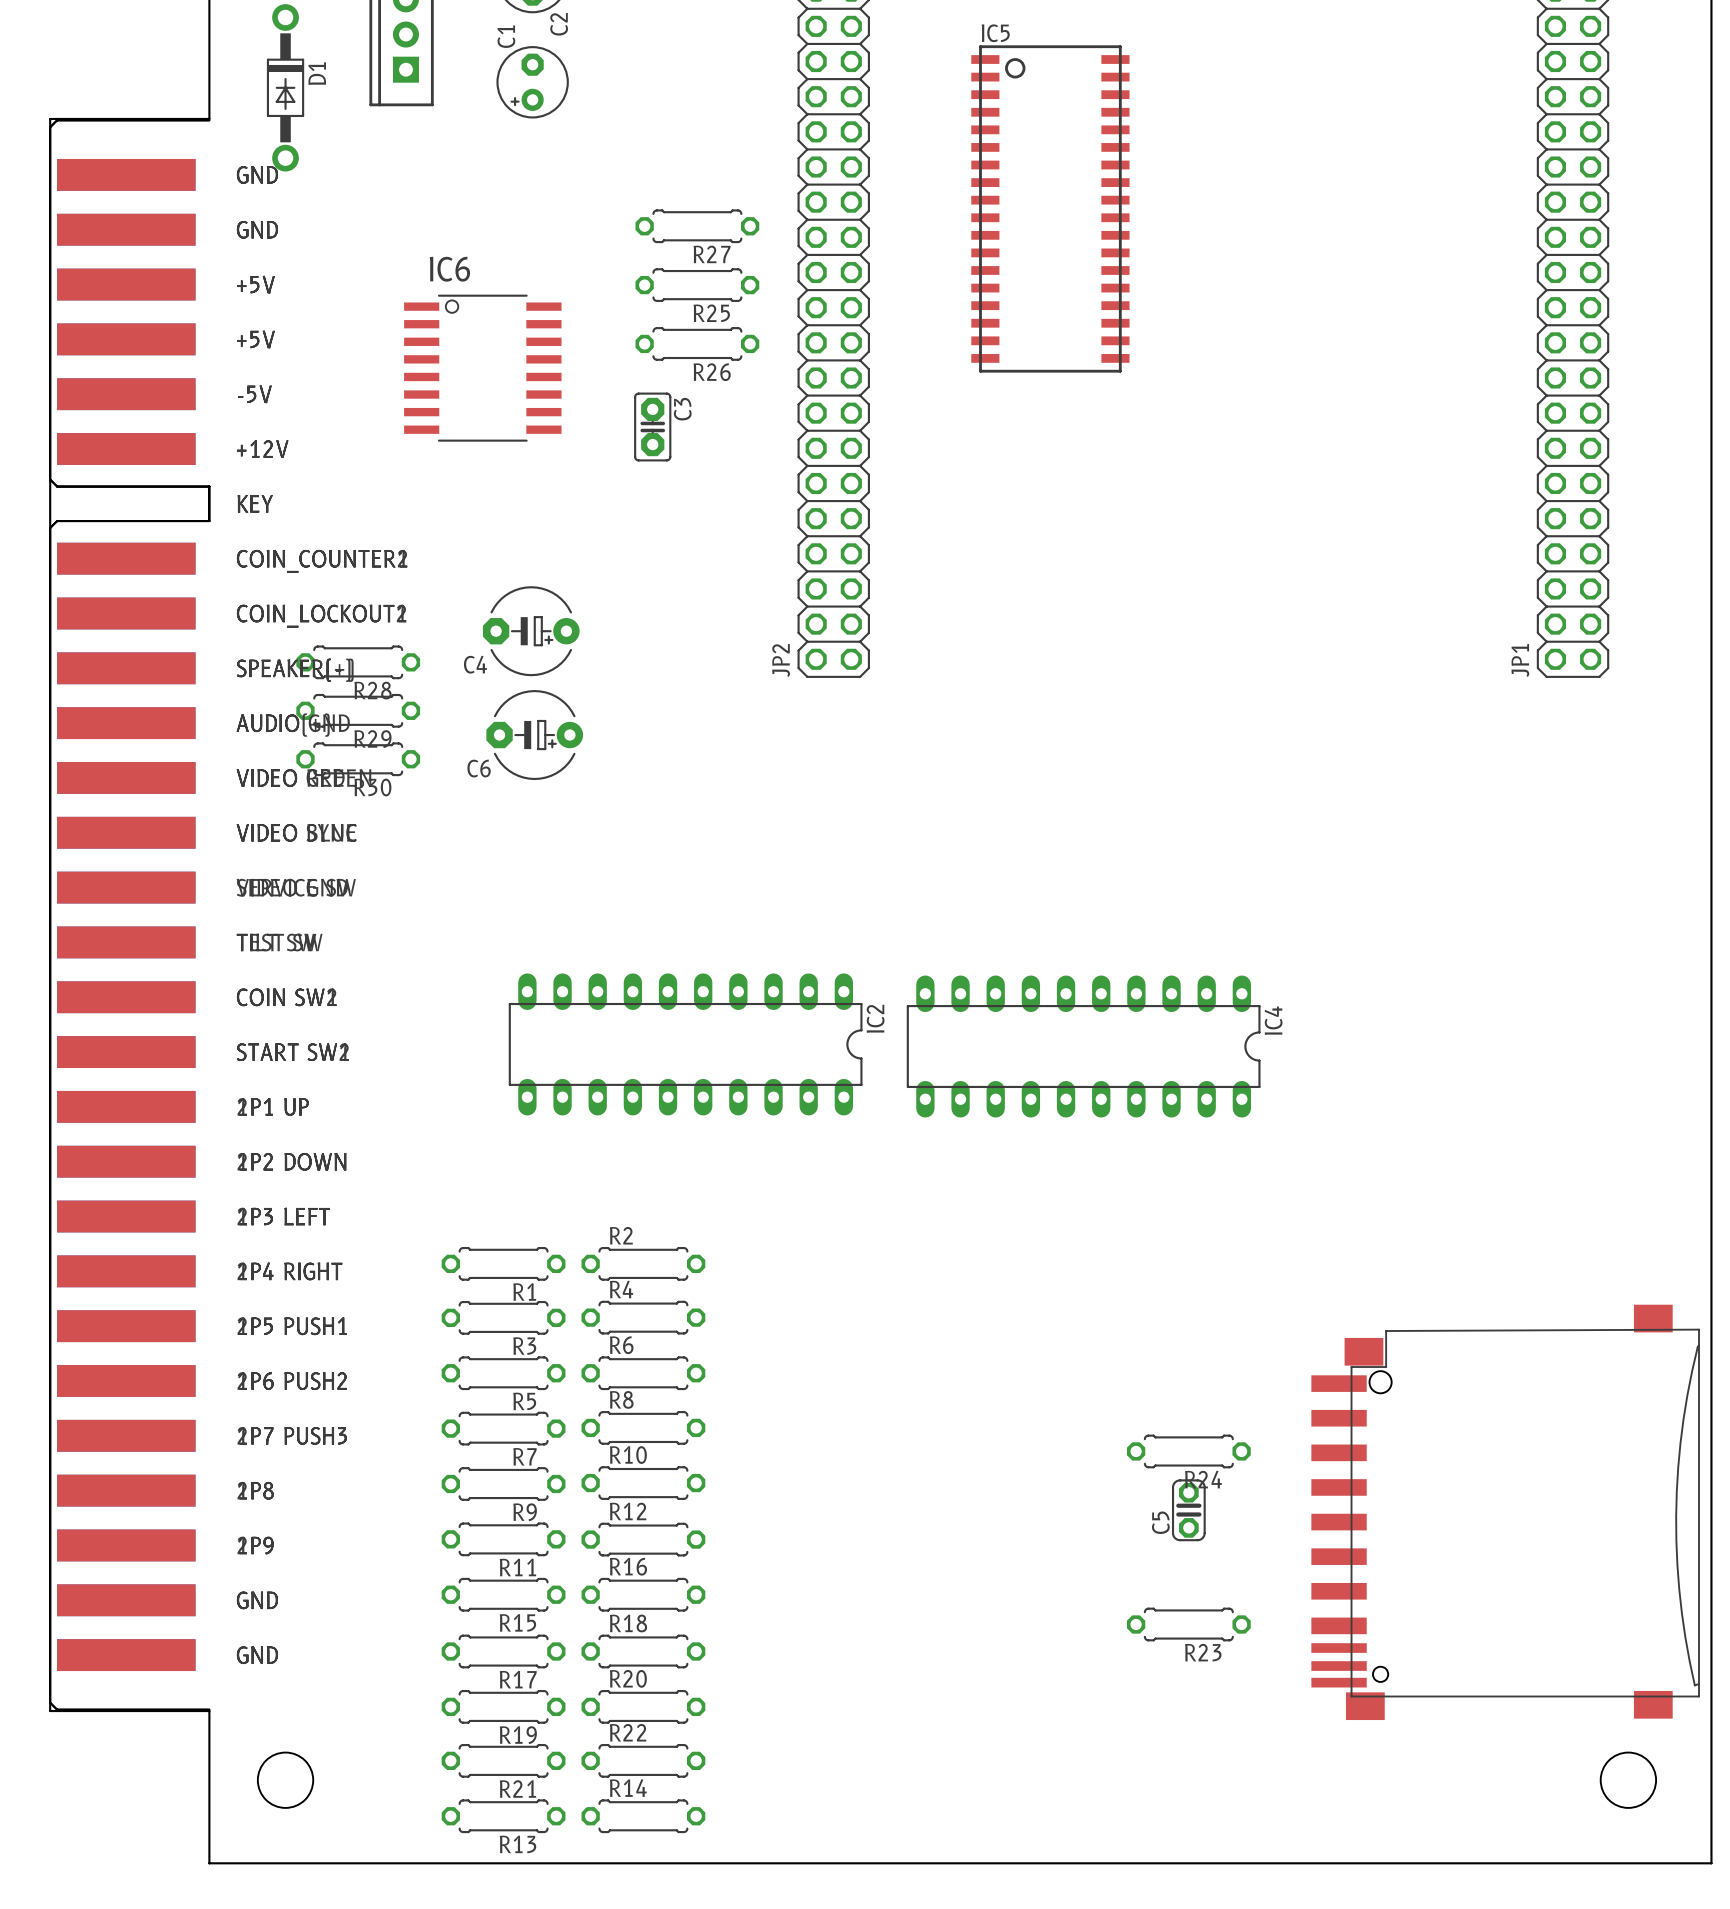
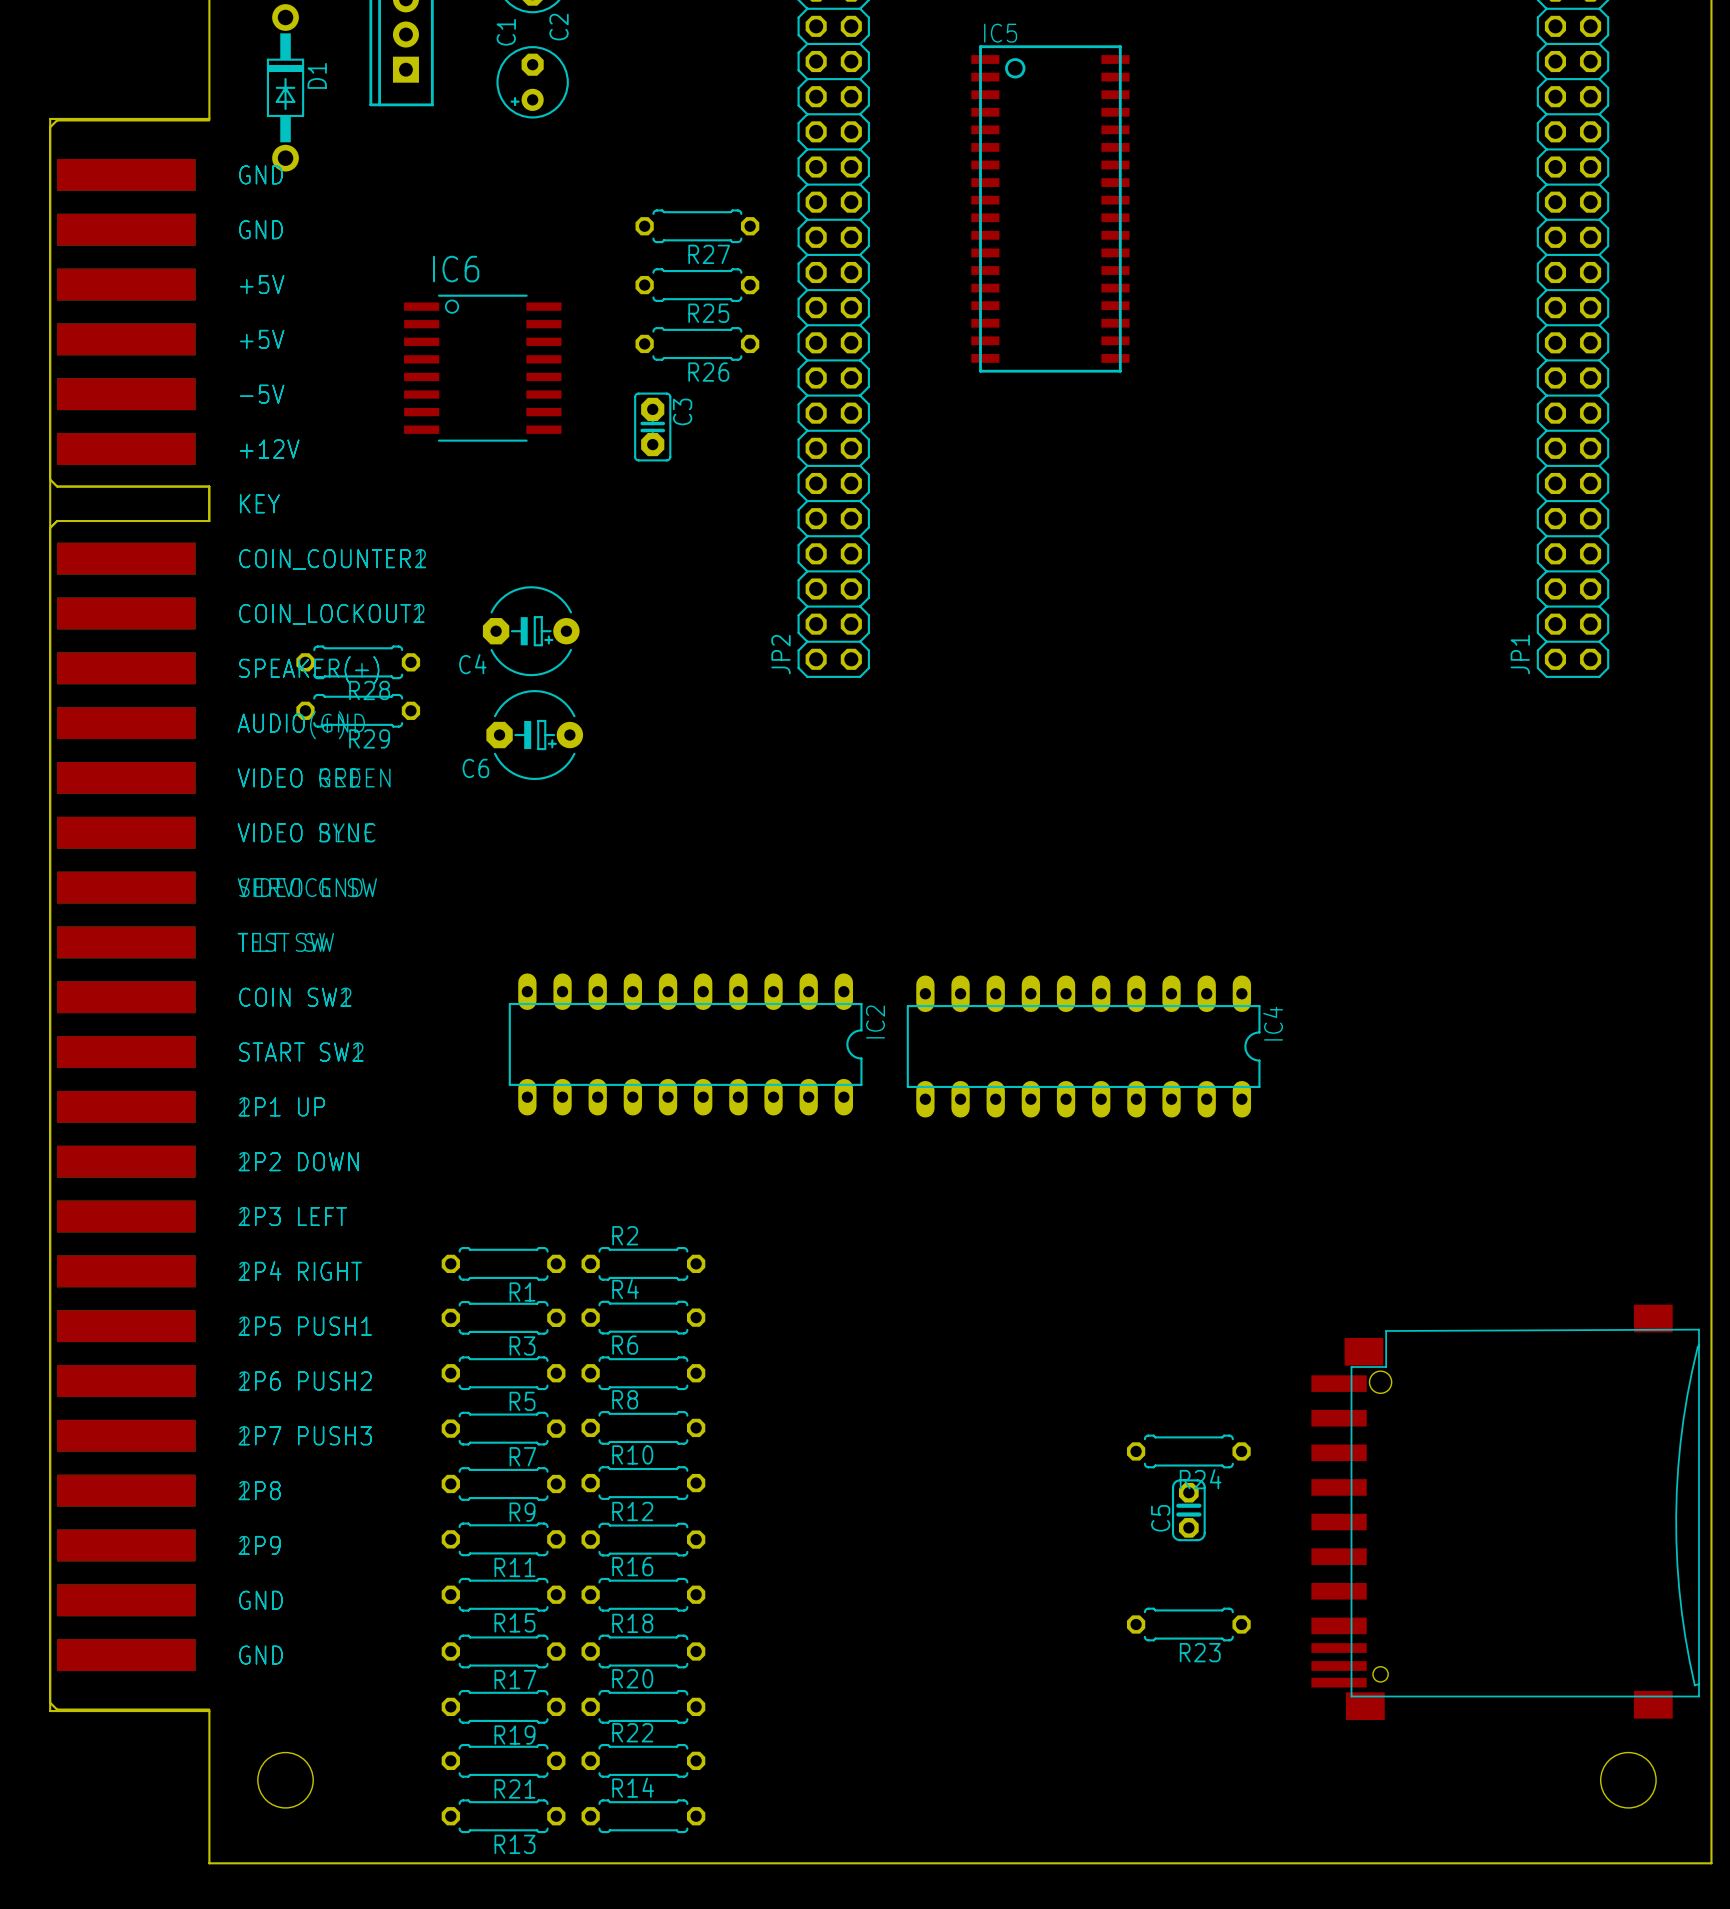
R30: (358, 759) -> none

